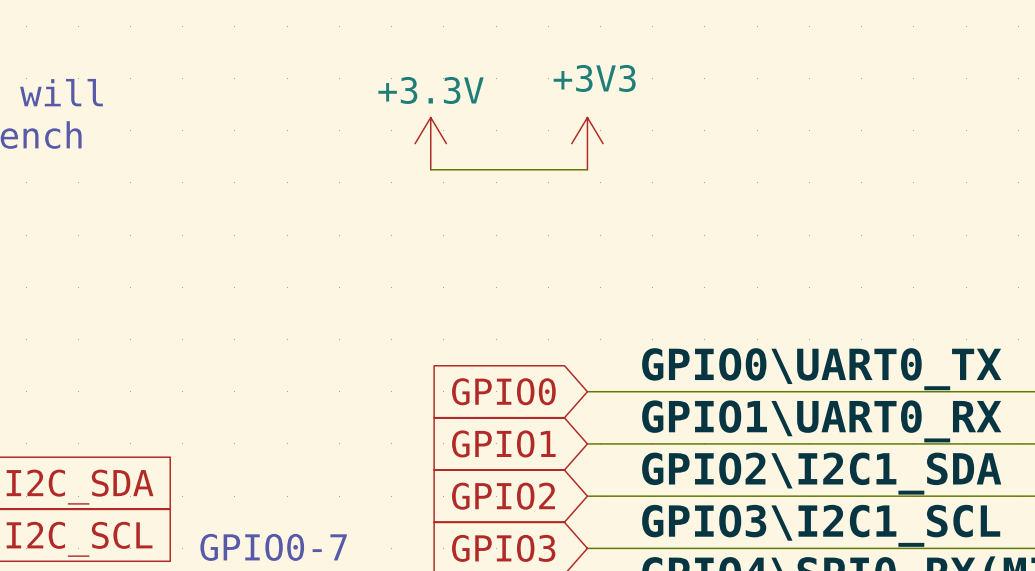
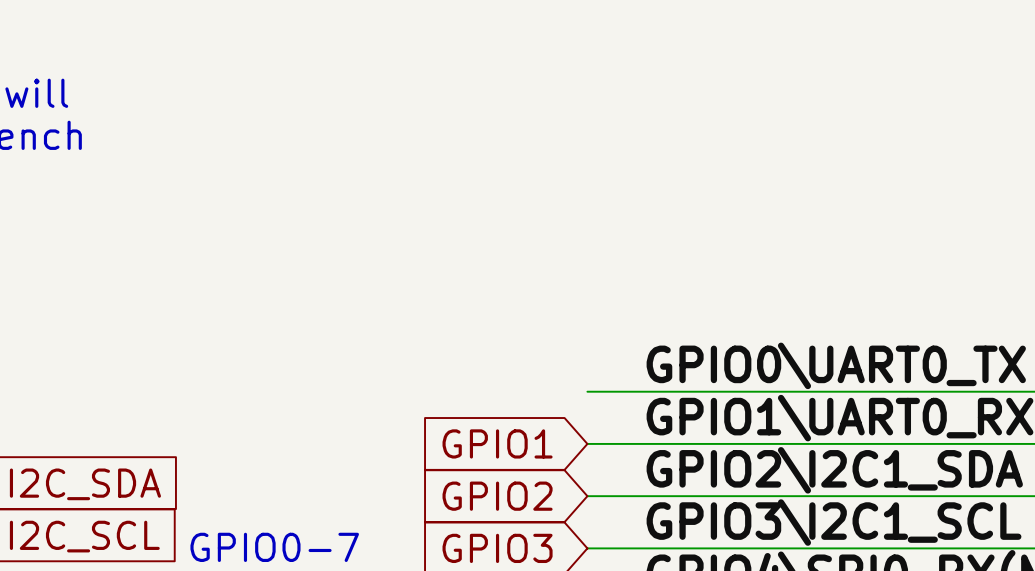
power symbol: +3.3V (430, 143) -> none
power symbol: +3V3 (587, 143) -> none
wire: (430, 169) (587, 169) -> none
global label: GPIO0 (503, 391) -> none

